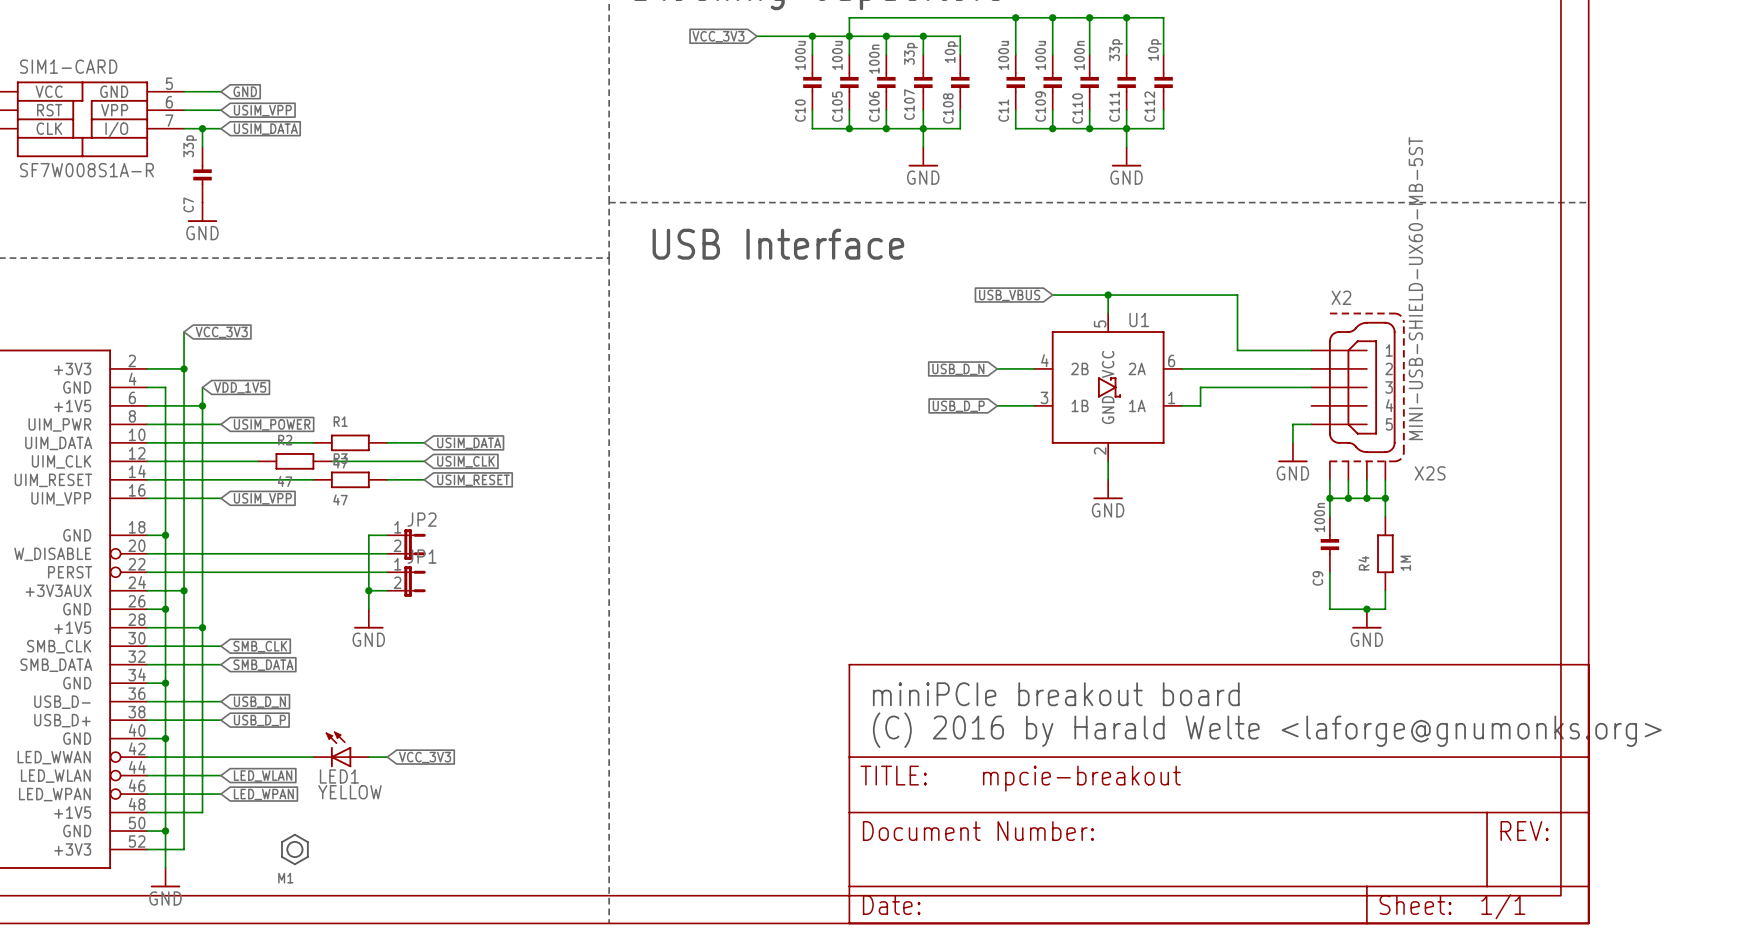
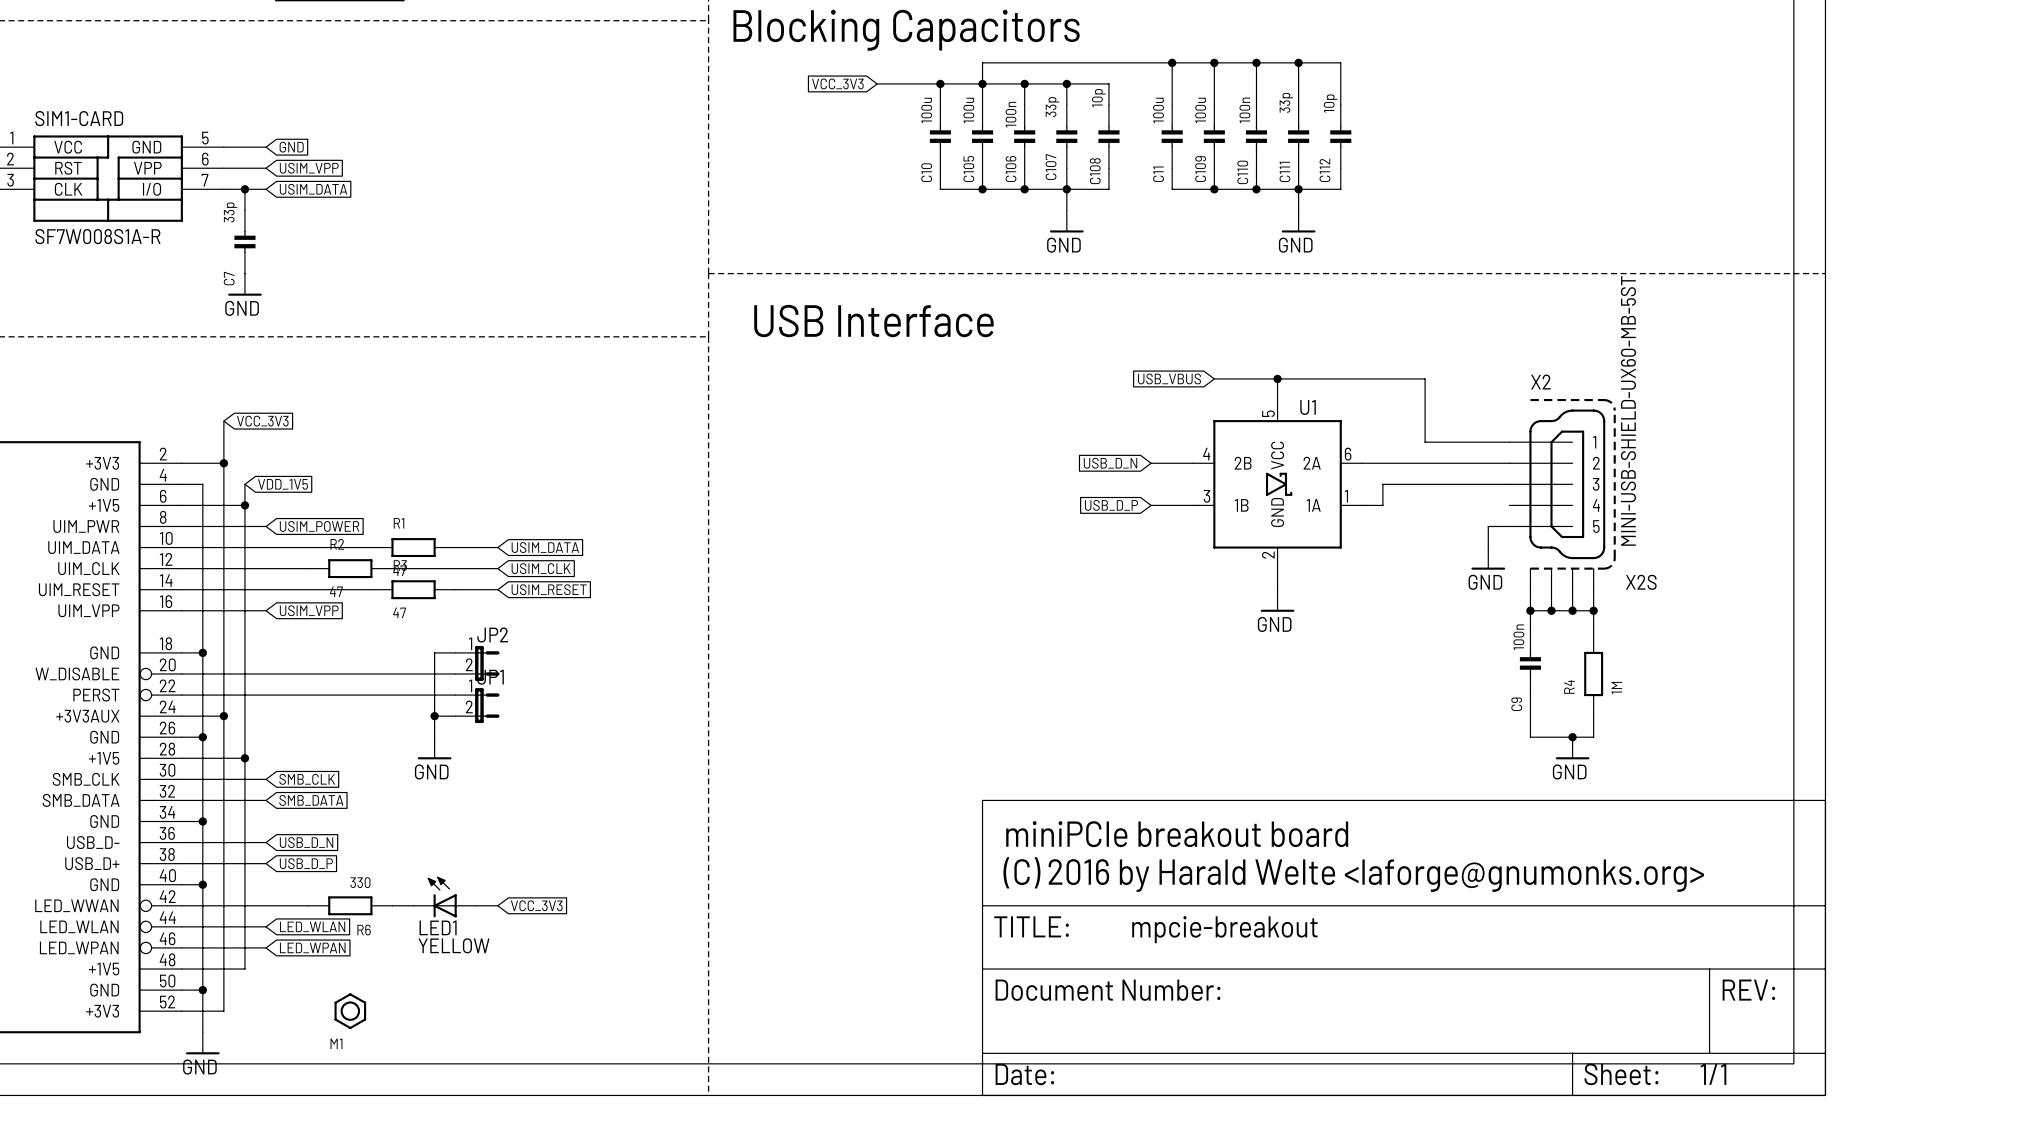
LED1 position: (341, 749) -> (445, 897)
wire: (257, 757) (313, 757) -> none
R6: none -> 330 (350, 905)
wire: none -> (476, 905) (497, 905)
global label position: VCC_3V3 (425, 757) -> VCC_3V3 (536, 905)

